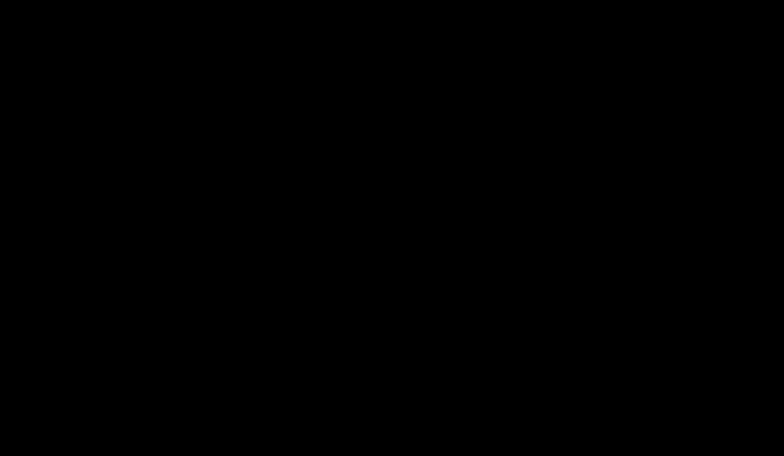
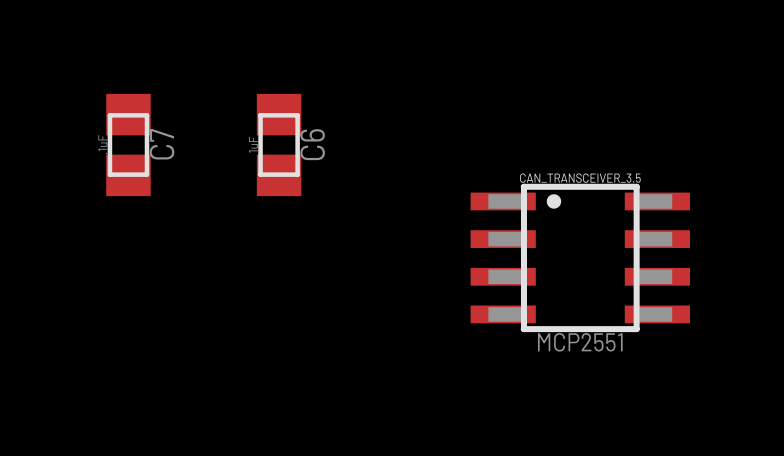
C7: none -> .1uF (128, 144)
C6: none -> 1uF (279, 144)
CAN_TRANSCEIVER_3.5: none -> MCP2551 (580, 257)

